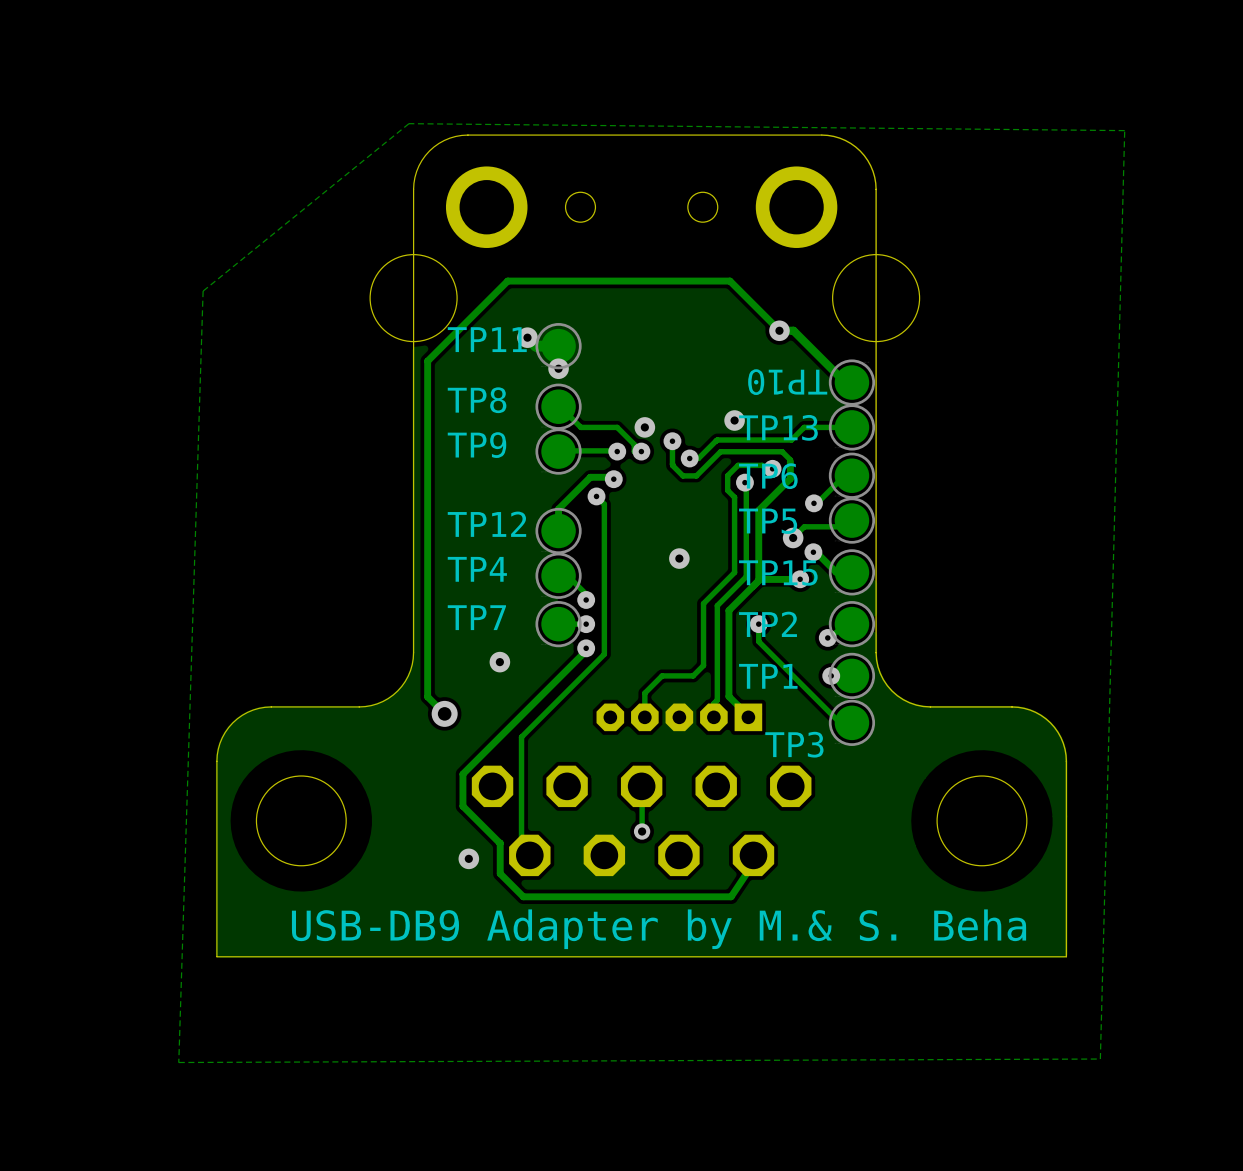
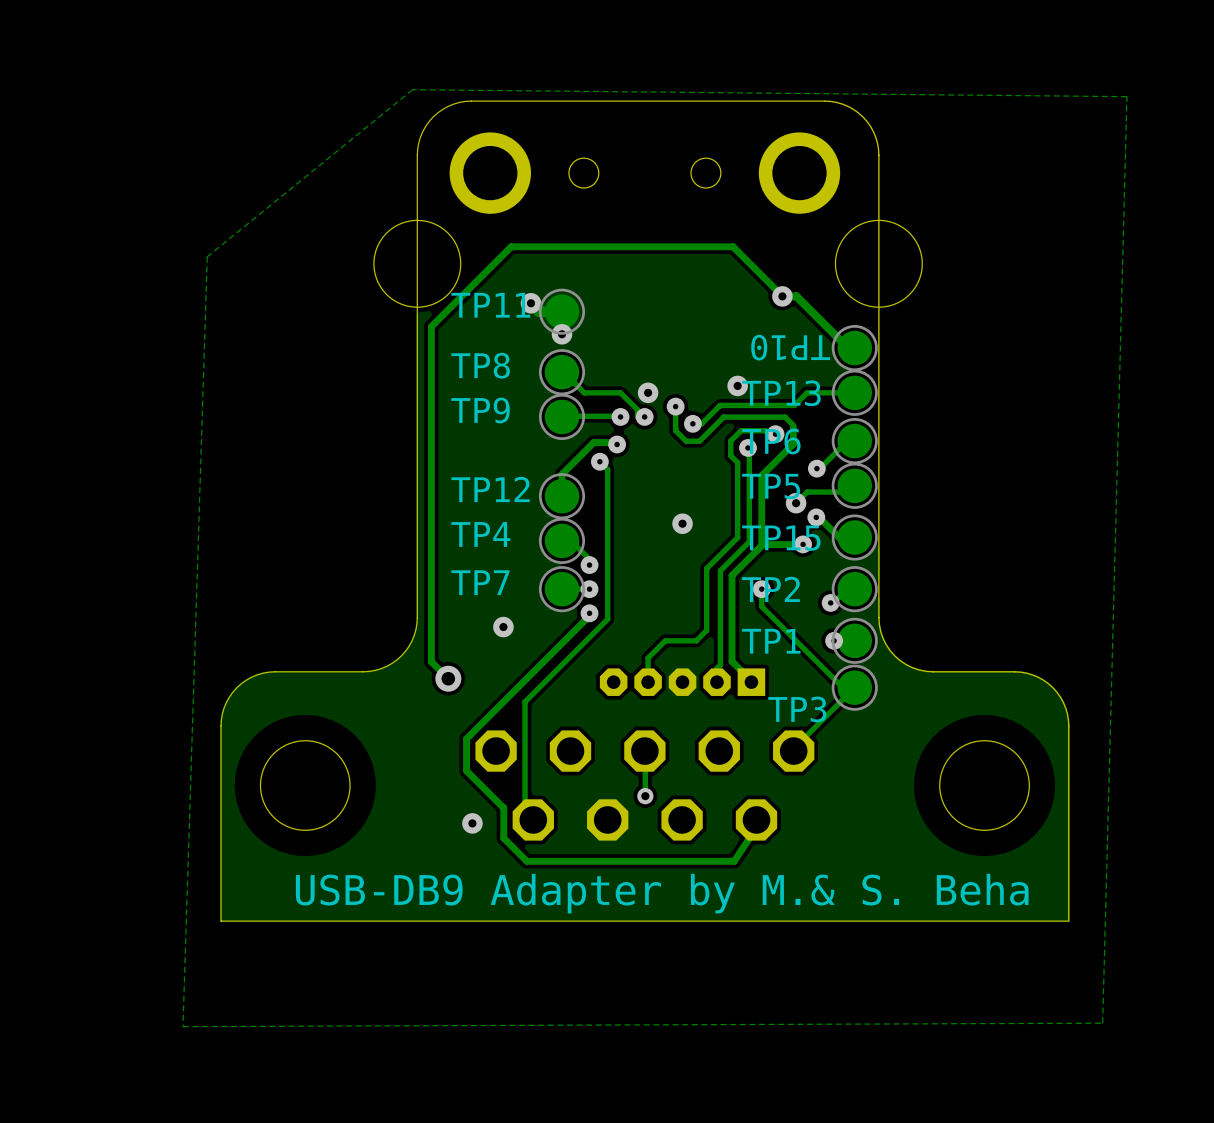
track: none -> (854, 687) (793, 748) (793, 751)

